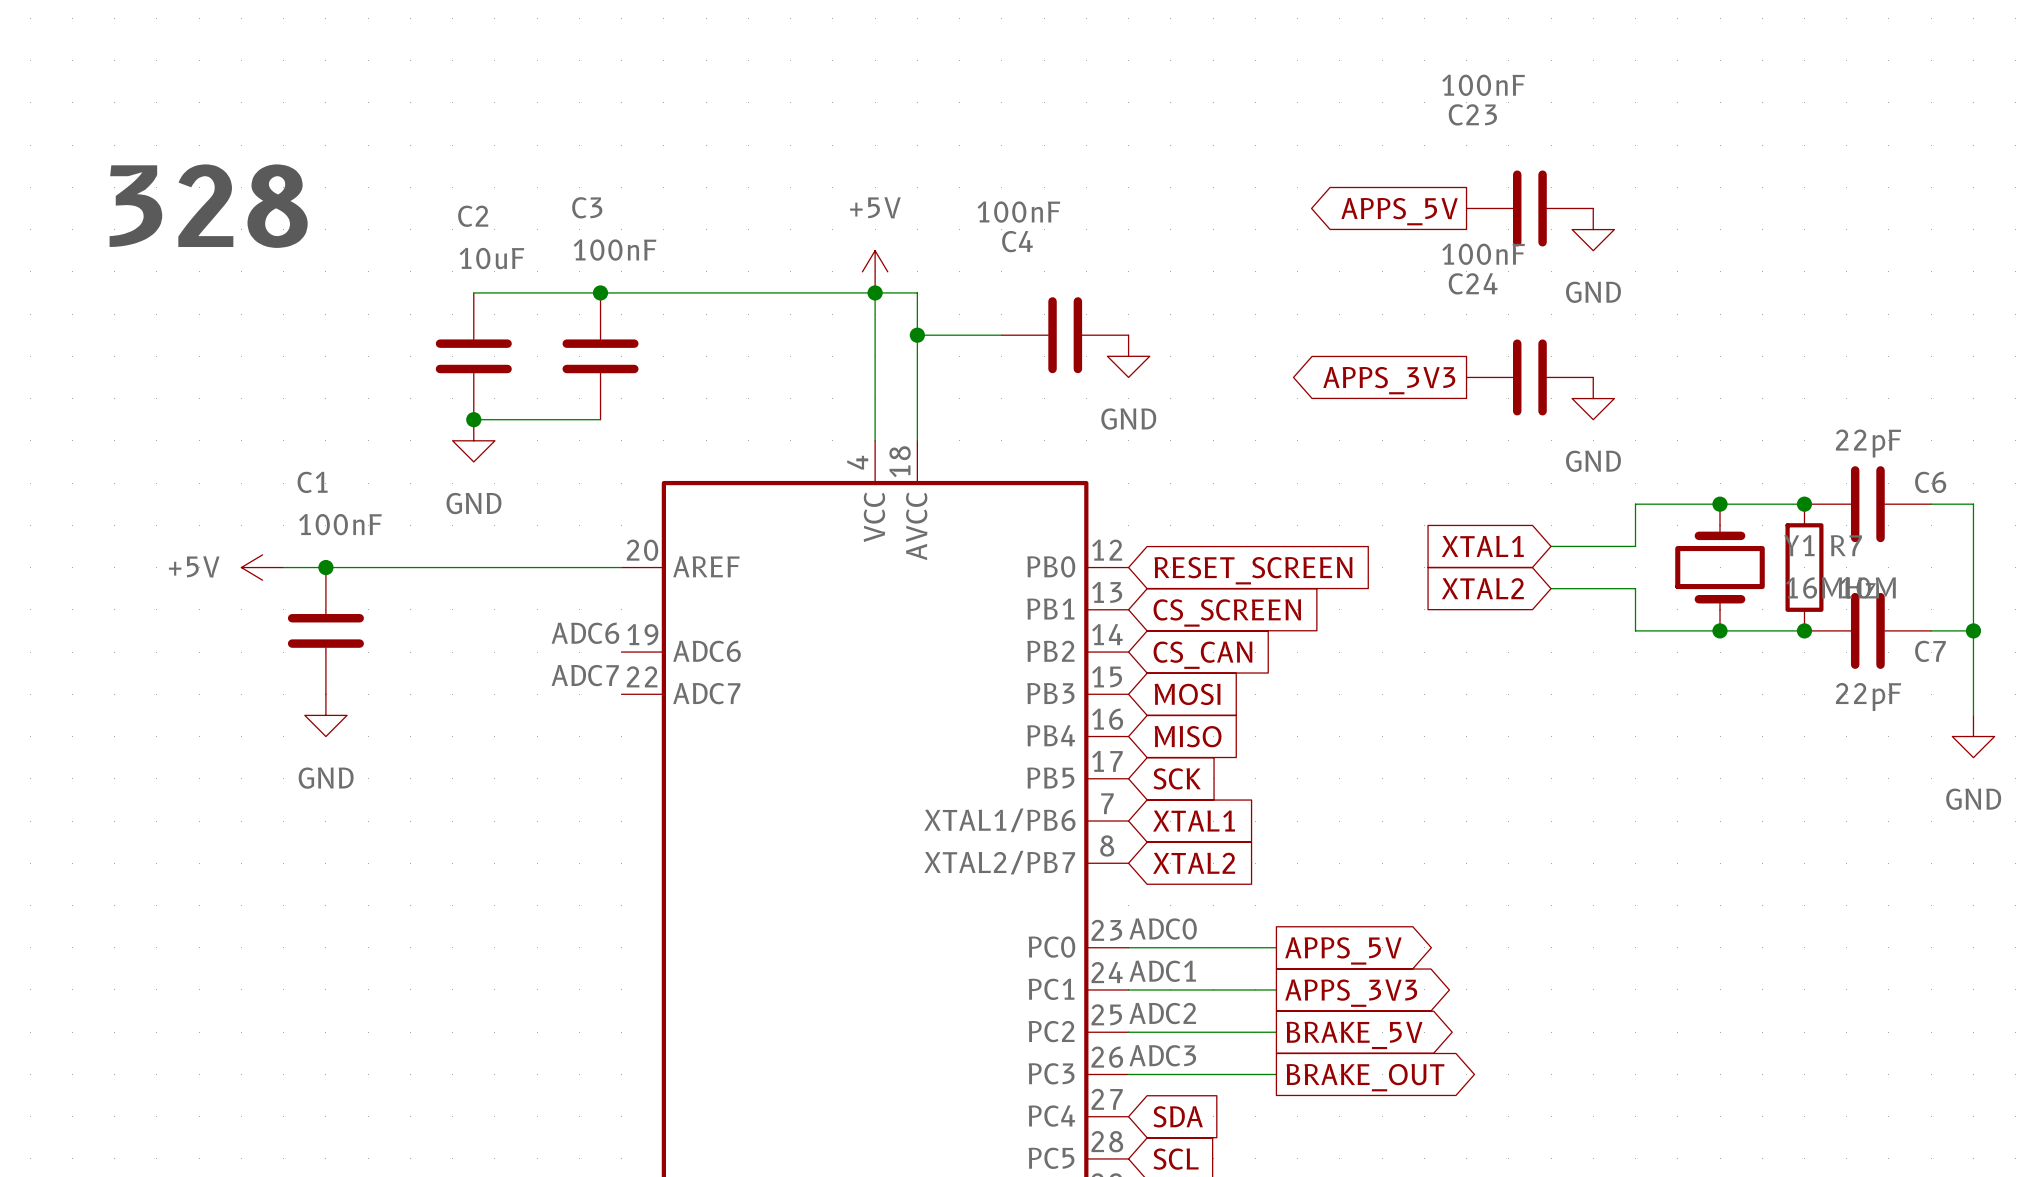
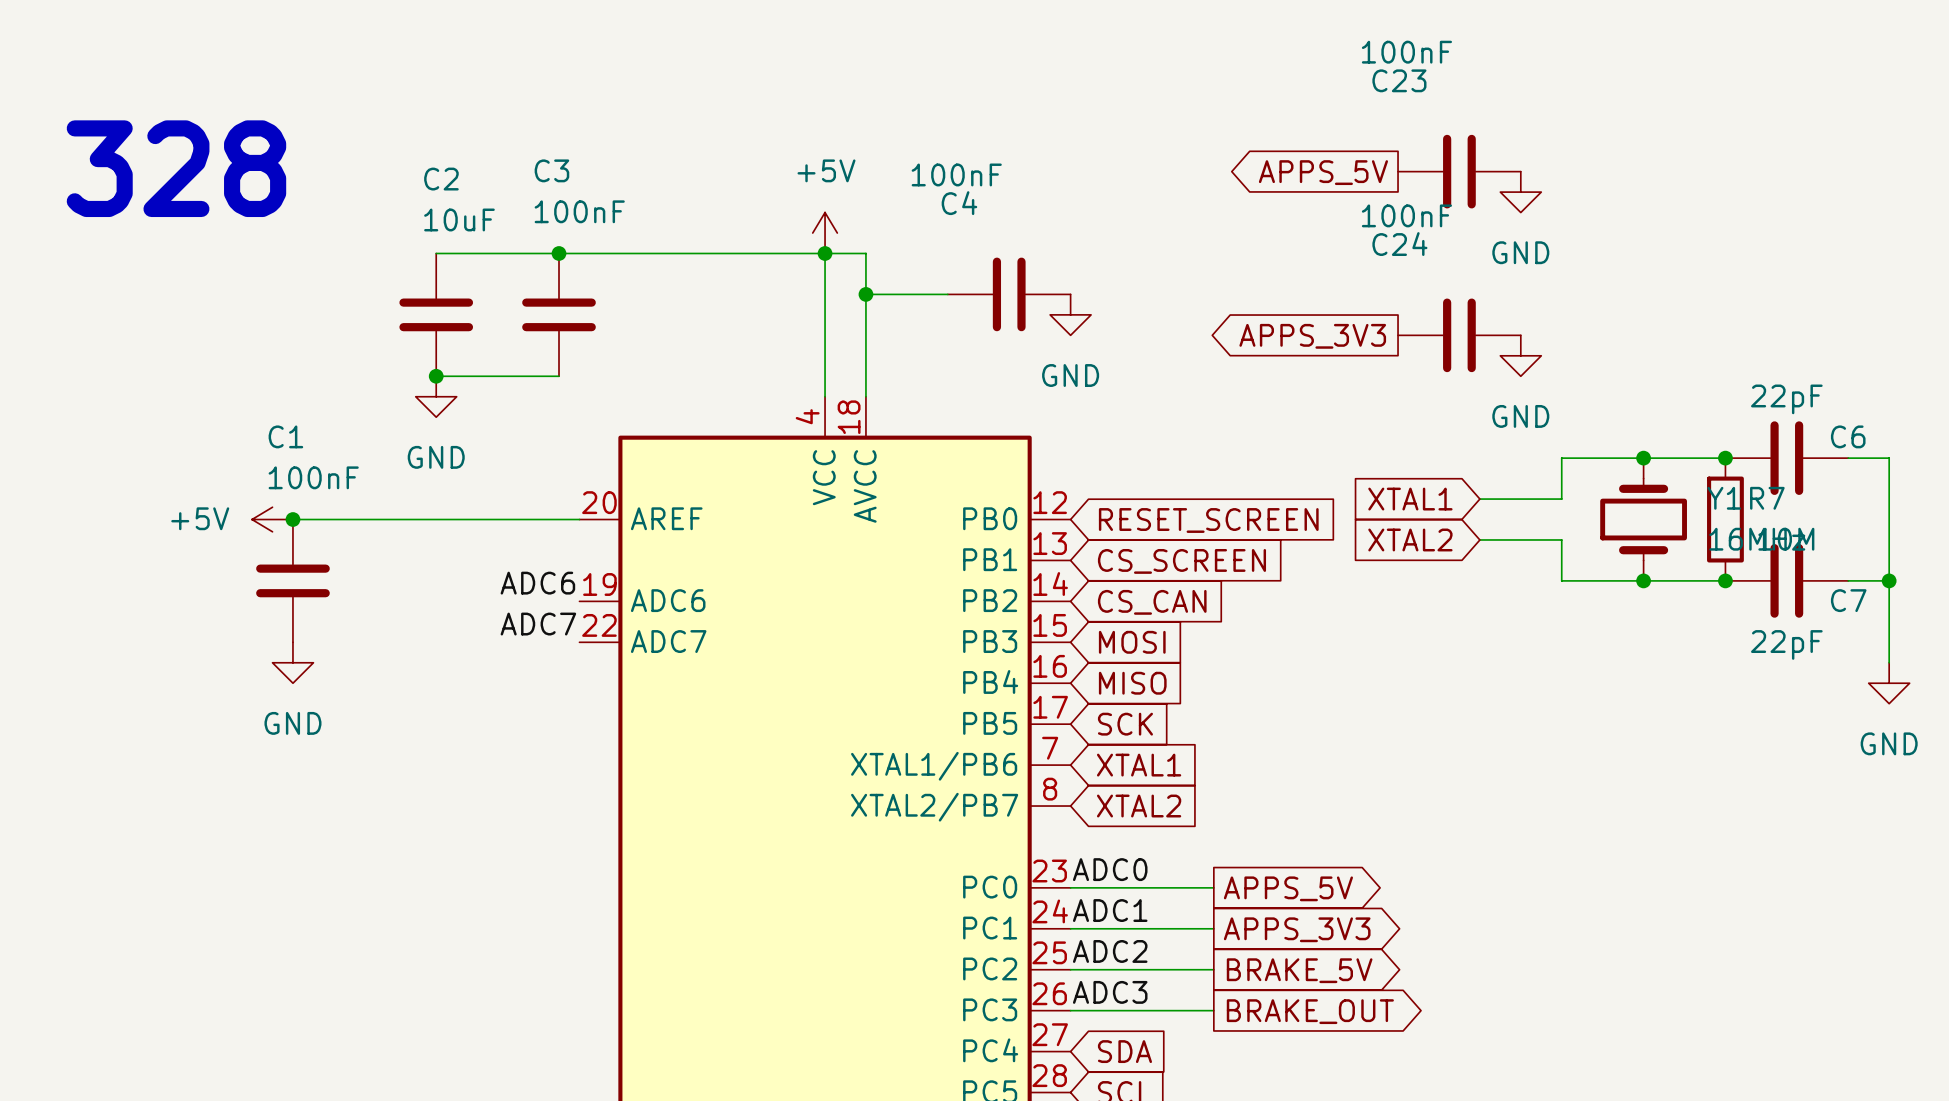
power symbol position: +5V (262, 567) -> +5V (272, 519)

